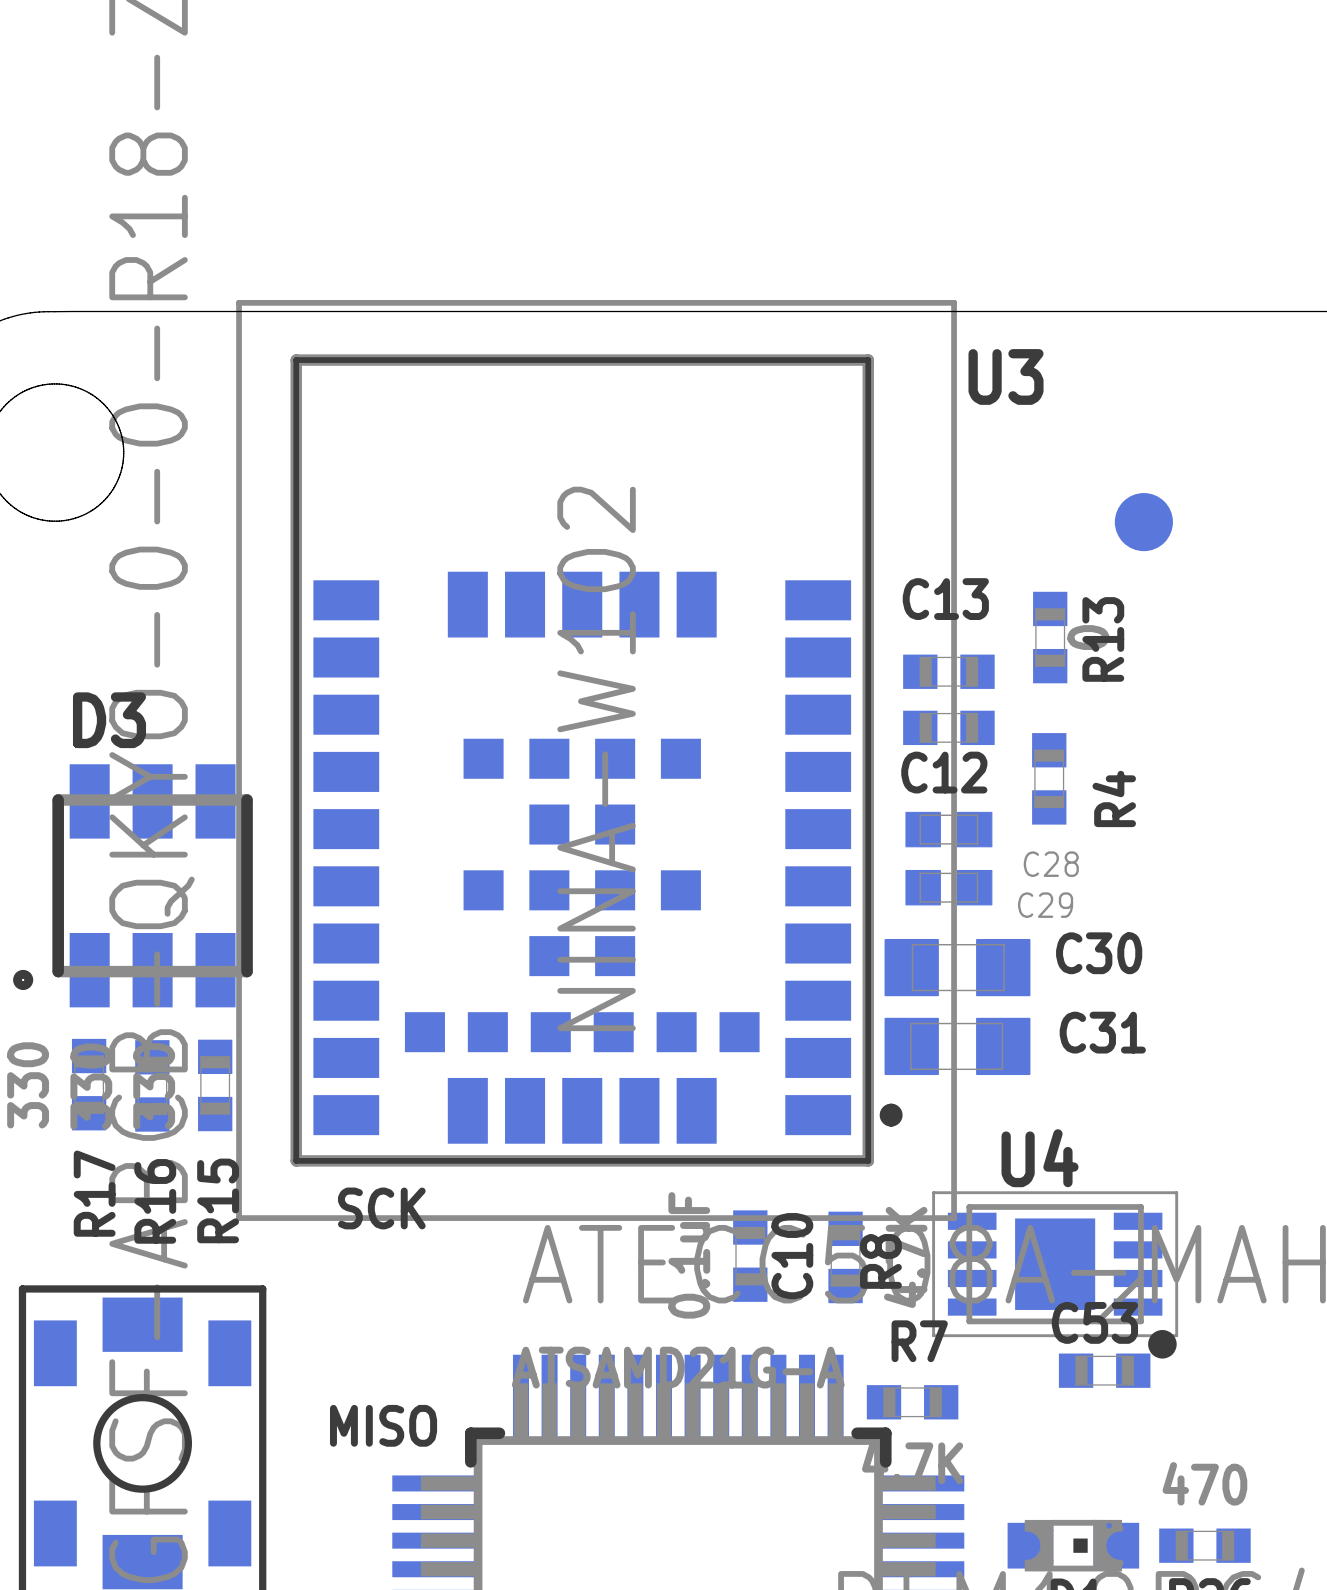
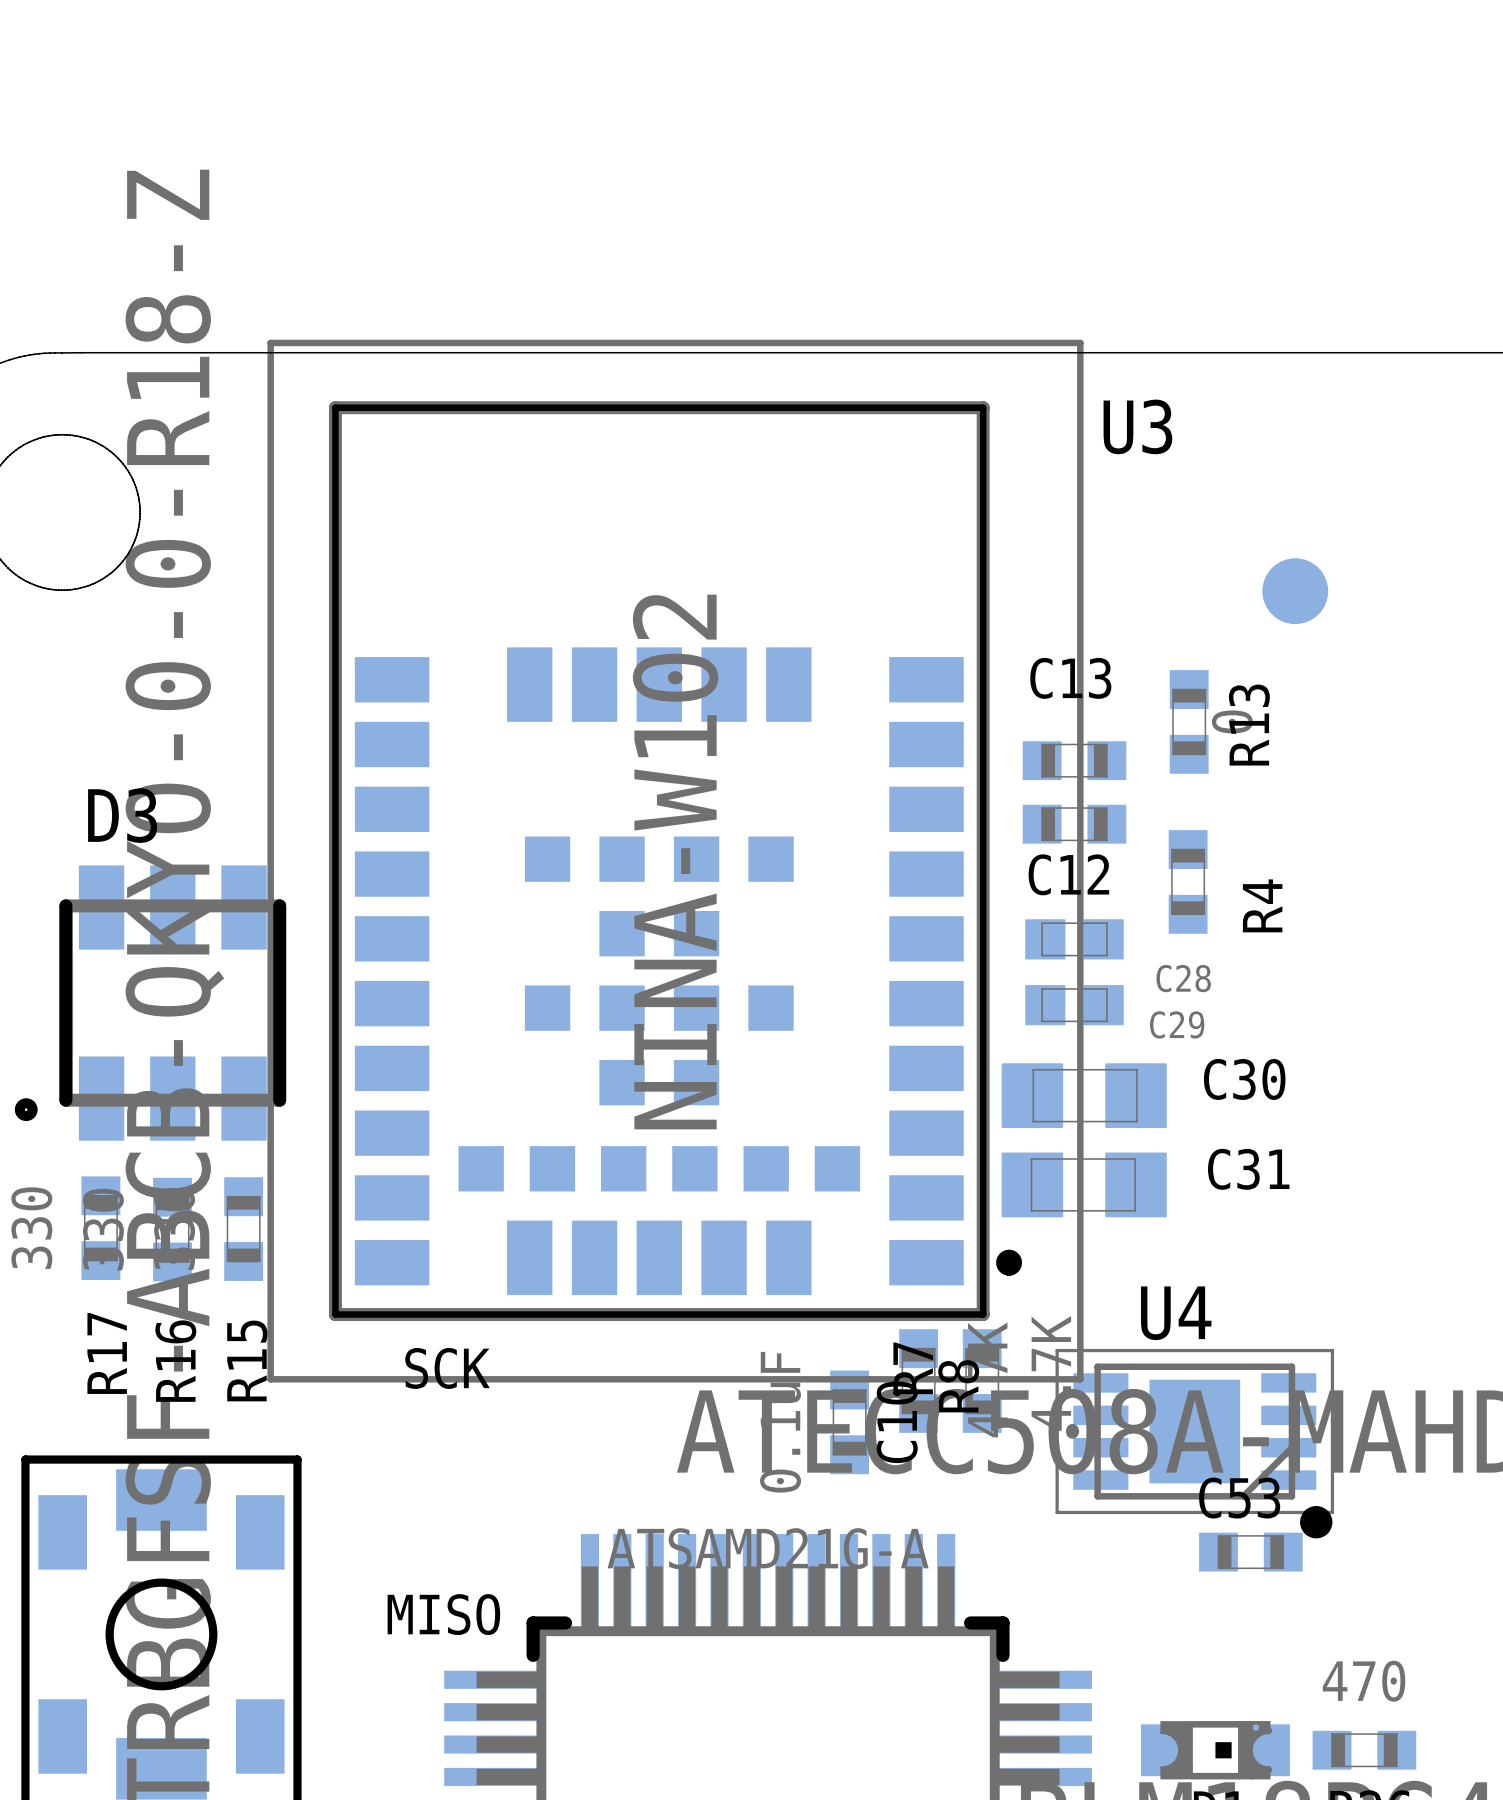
R8 position: (845, 1257) -> (918, 1381)
R7 rotation: 0° (912, 1402) -> 90° clockwise (982, 1381)
R7 position: (912, 1402) -> (982, 1381)

